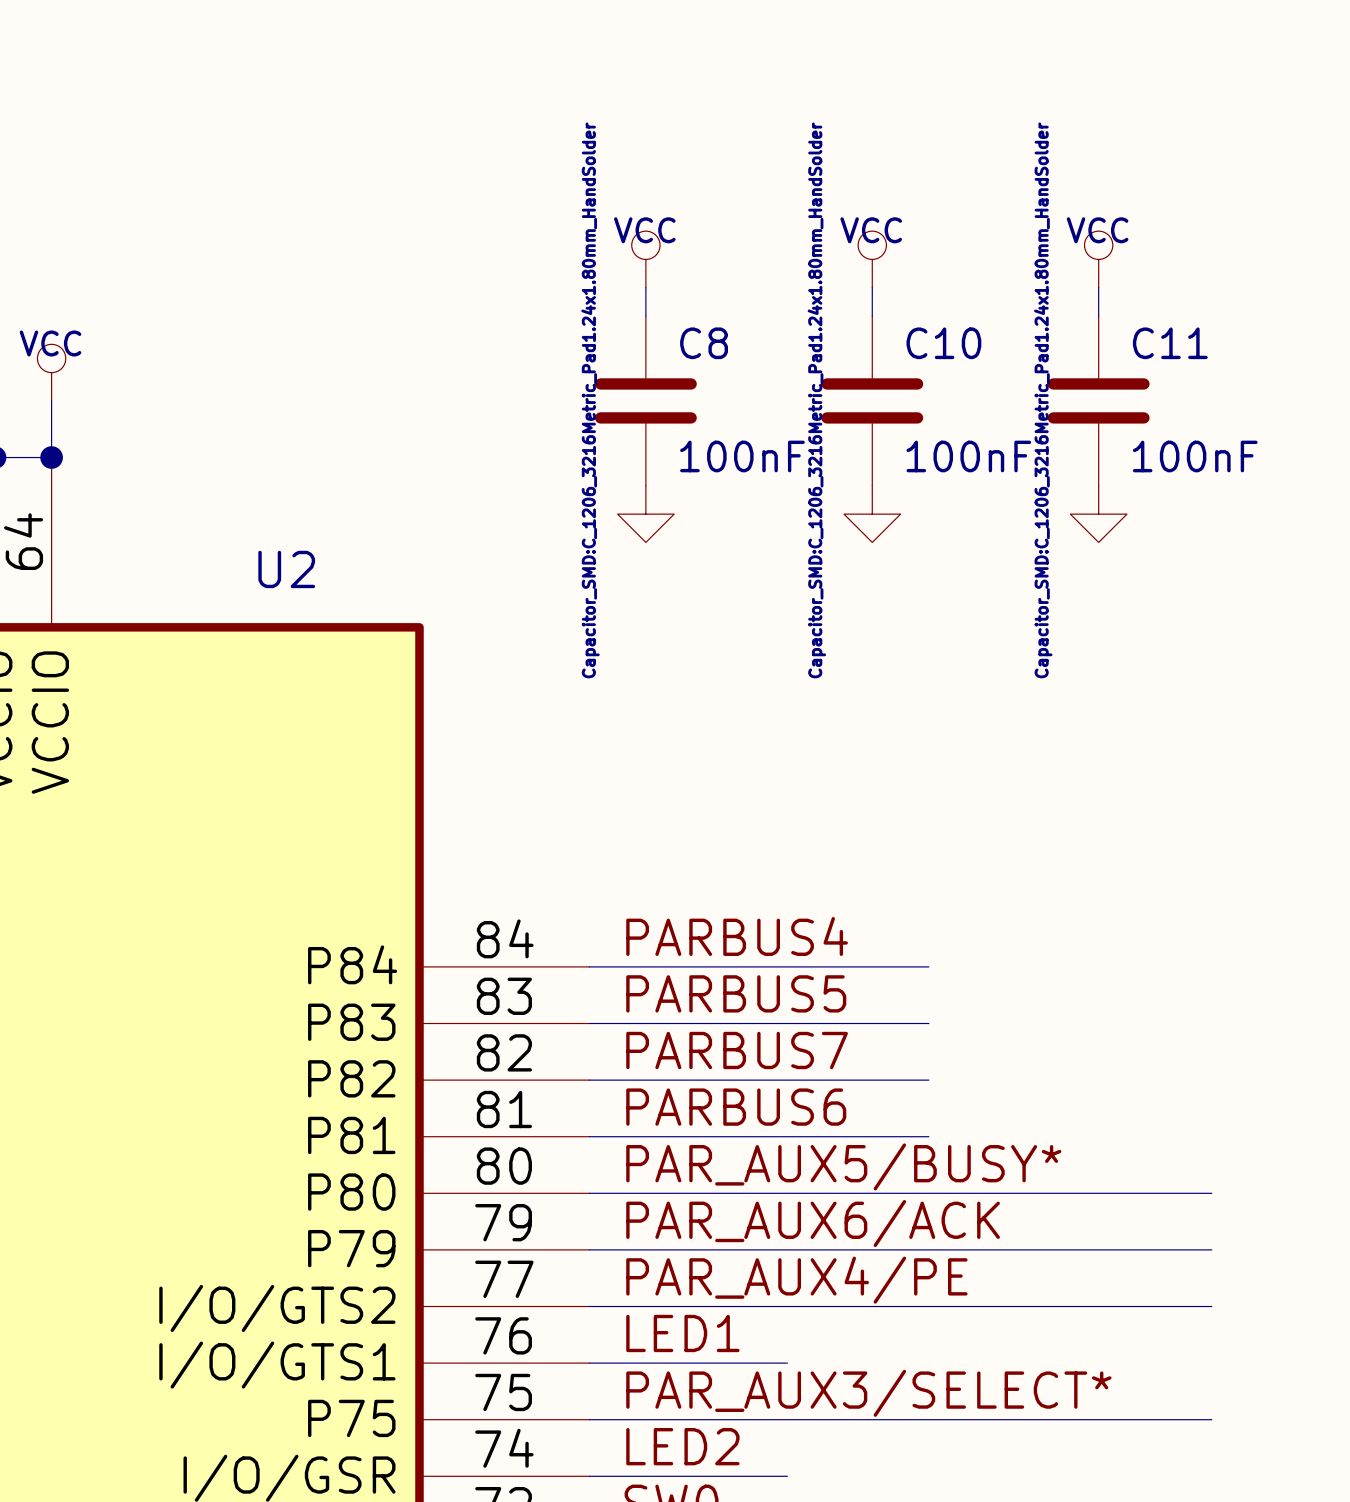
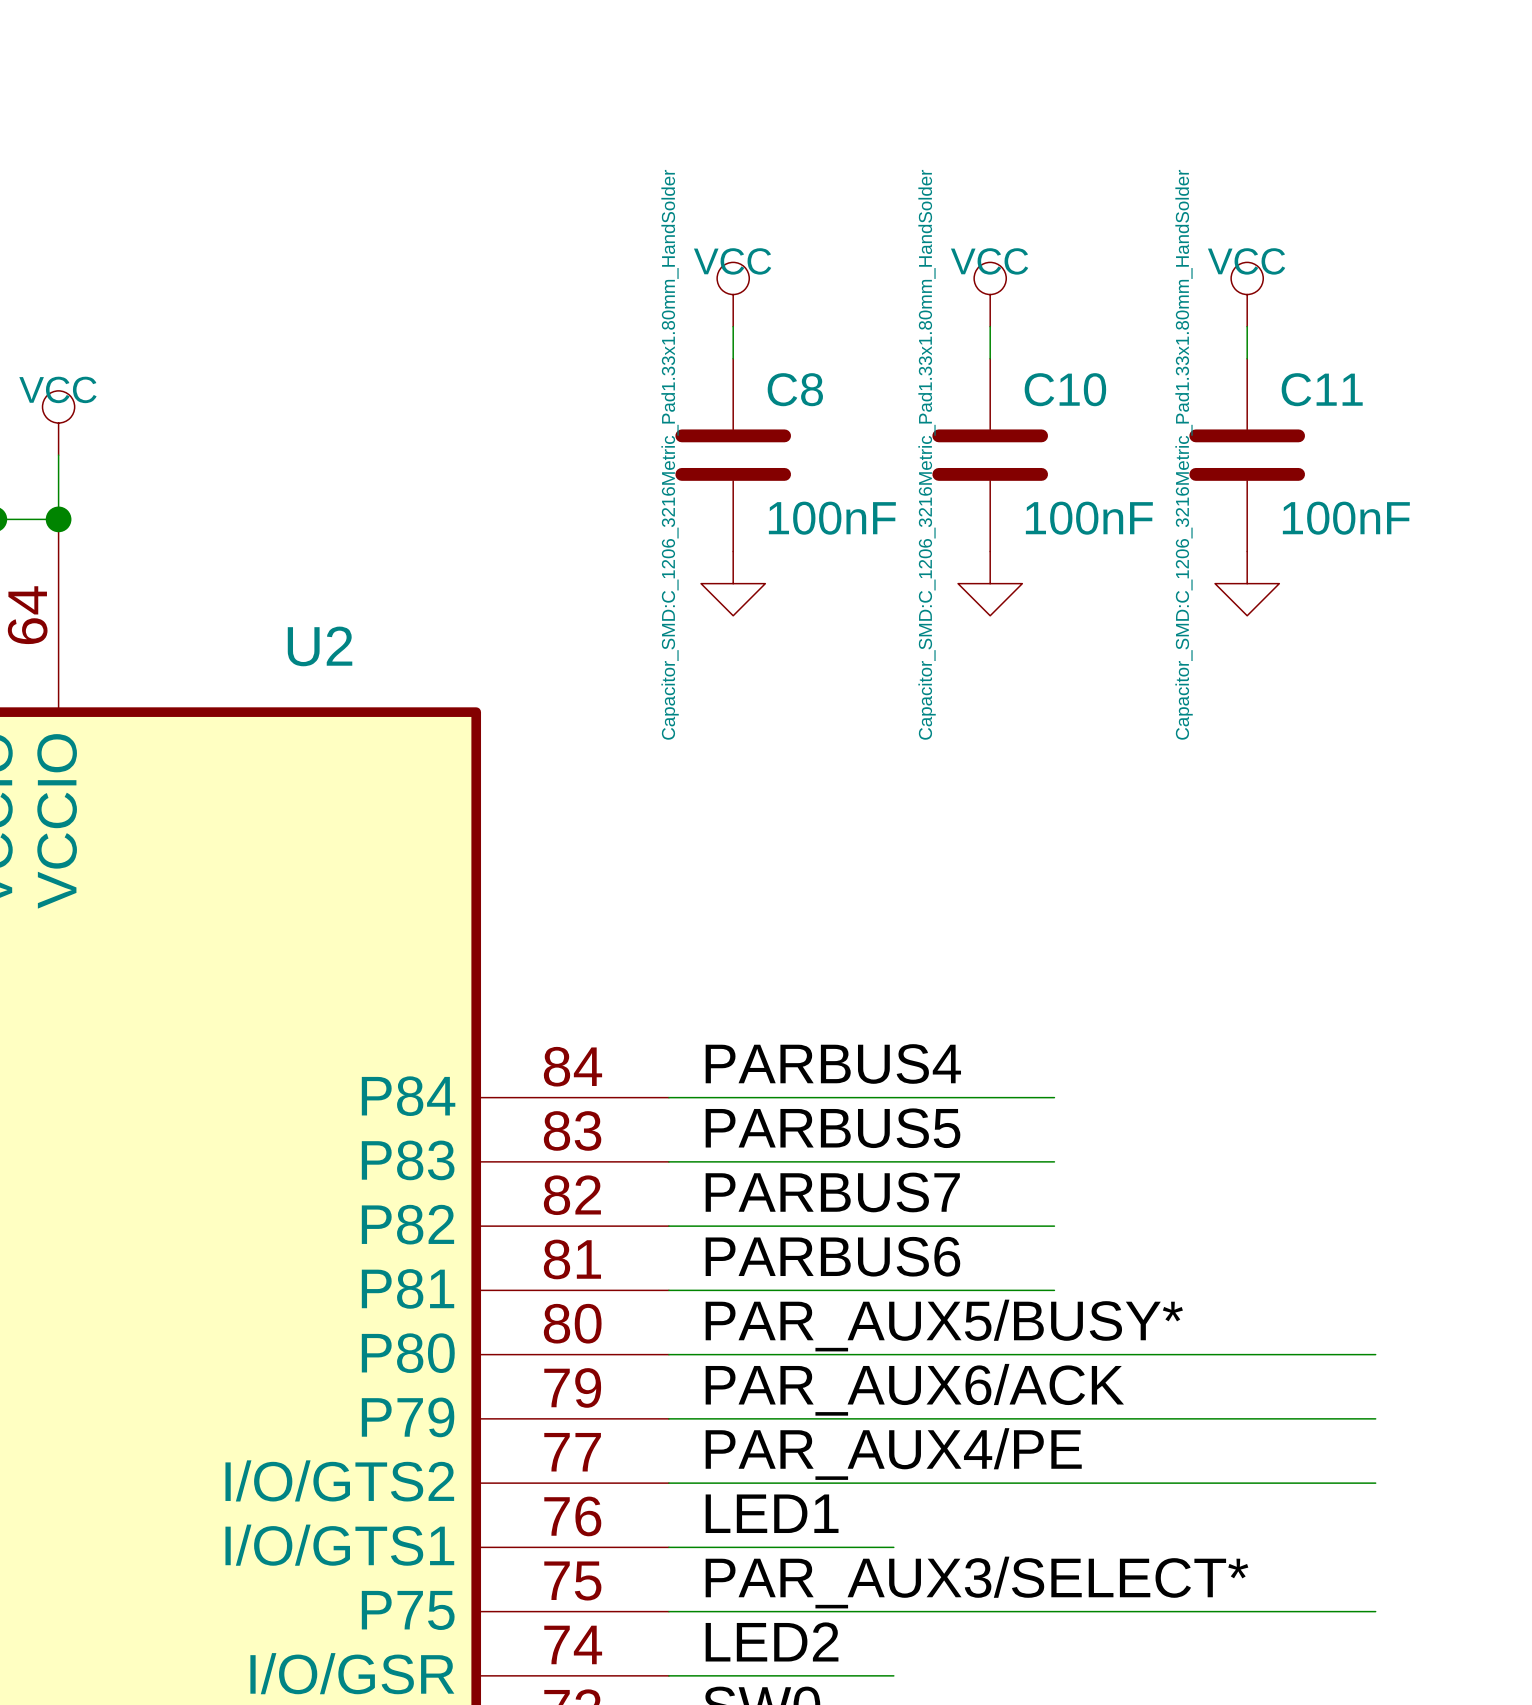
C8 text: Capacitor_SMD:C_1206_3216Metric_Pad1.24x1.80mm_HandSolder (590, 400) -> Capacitor_SMD:C_1206_3216Metric_Pad1.33x1.80mm_HandSolder (670, 454)
C10 text: Capacitor_SMD:C_1206_3216Metric_Pad1.24x1.80mm_HandSolder (816, 400) -> Capacitor_SMD:C_1206_3216Metric_Pad1.33x1.80mm_HandSolder (927, 454)
C11 text: Capacitor_SMD:C_1206_3216Metric_Pad1.24x1.80mm_HandSolder (1043, 400) -> Capacitor_SMD:C_1206_3216Metric_Pad1.33x1.80mm_HandSolder (1184, 454)

